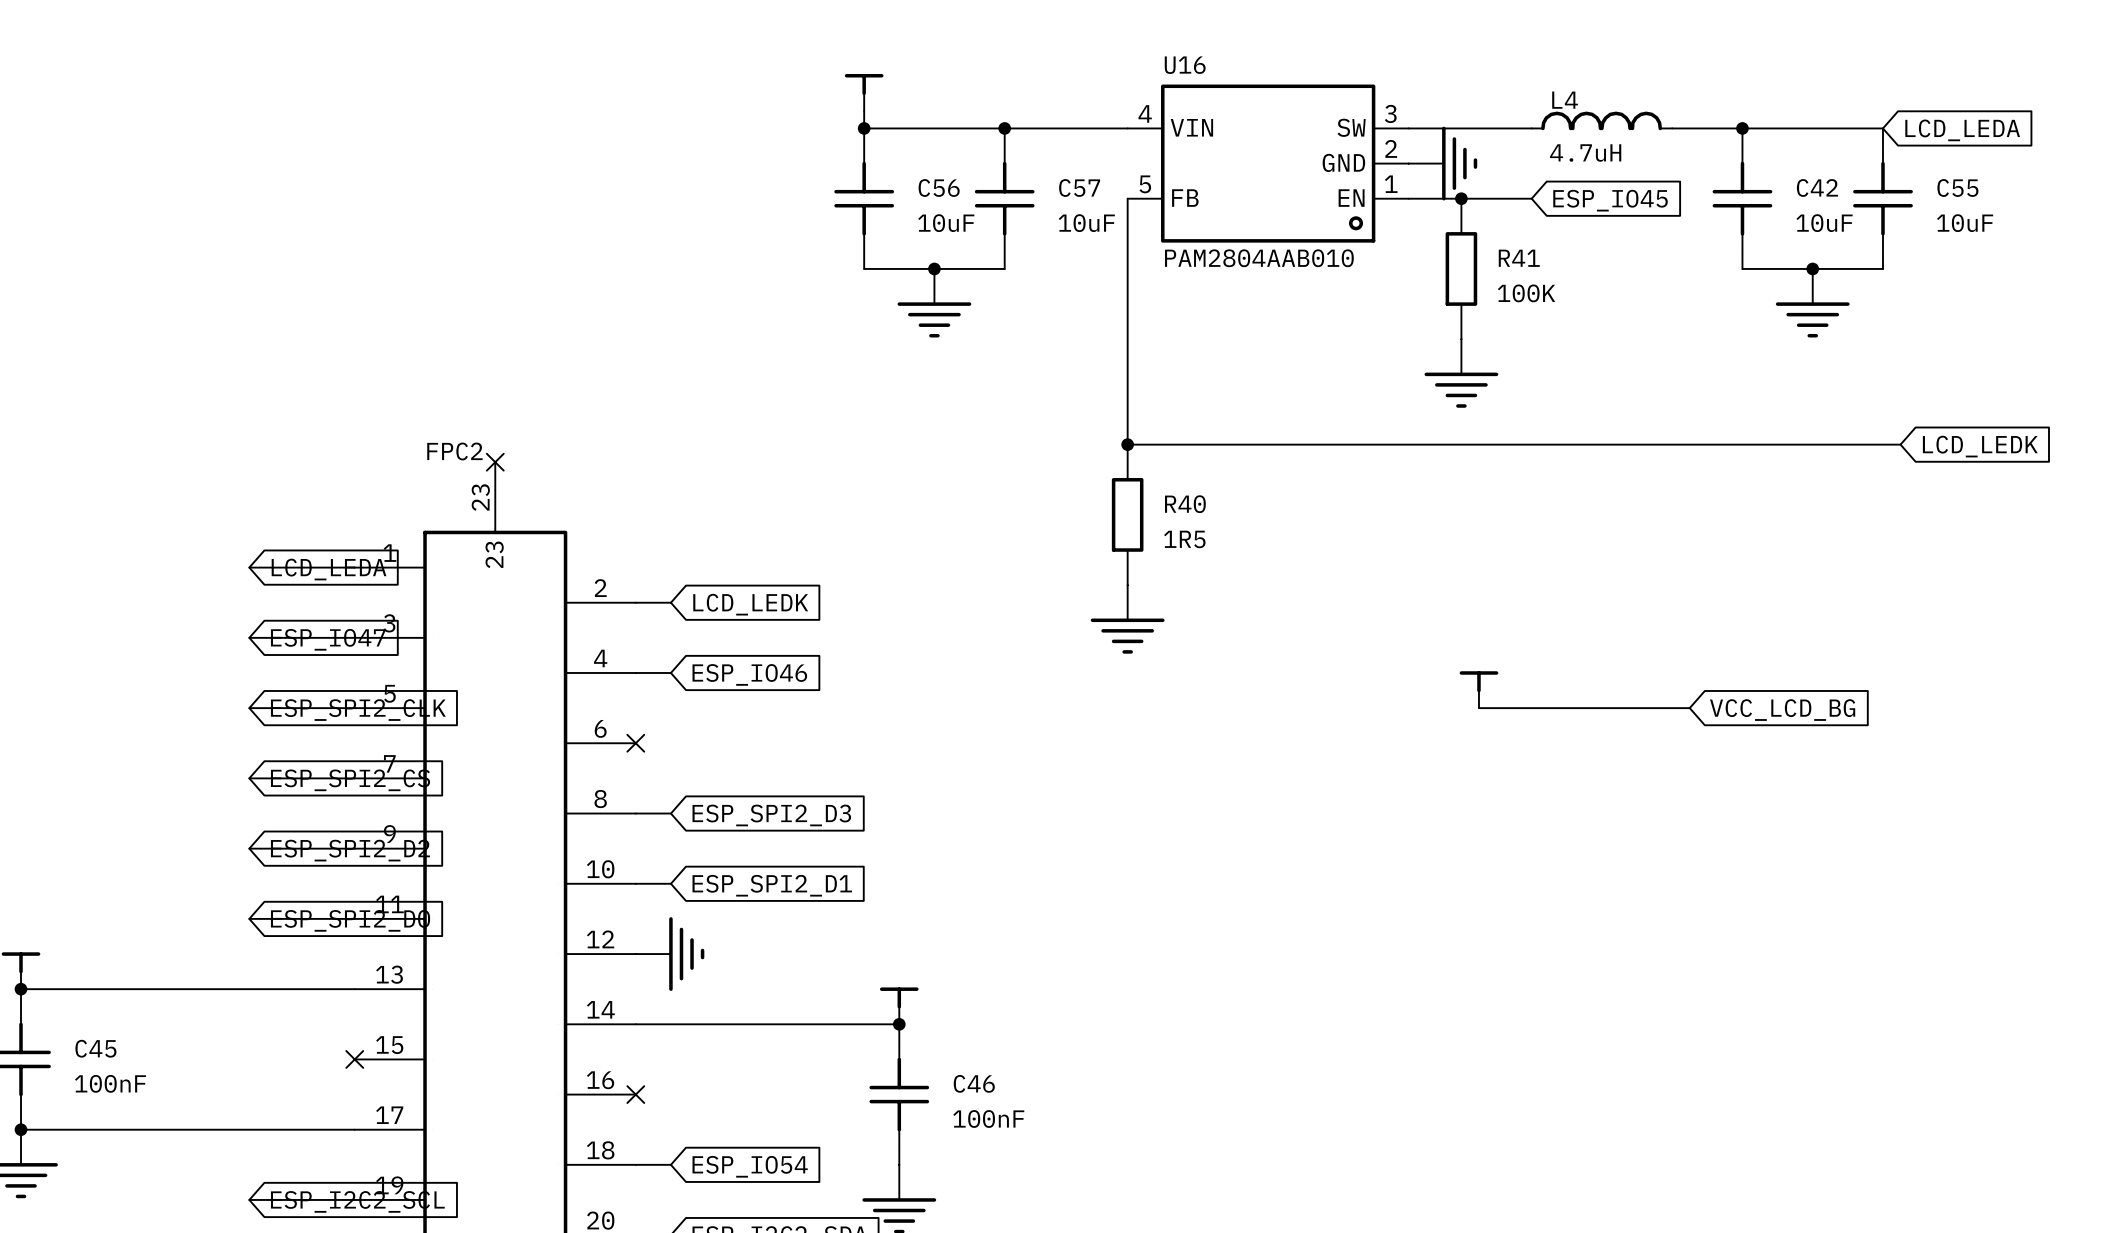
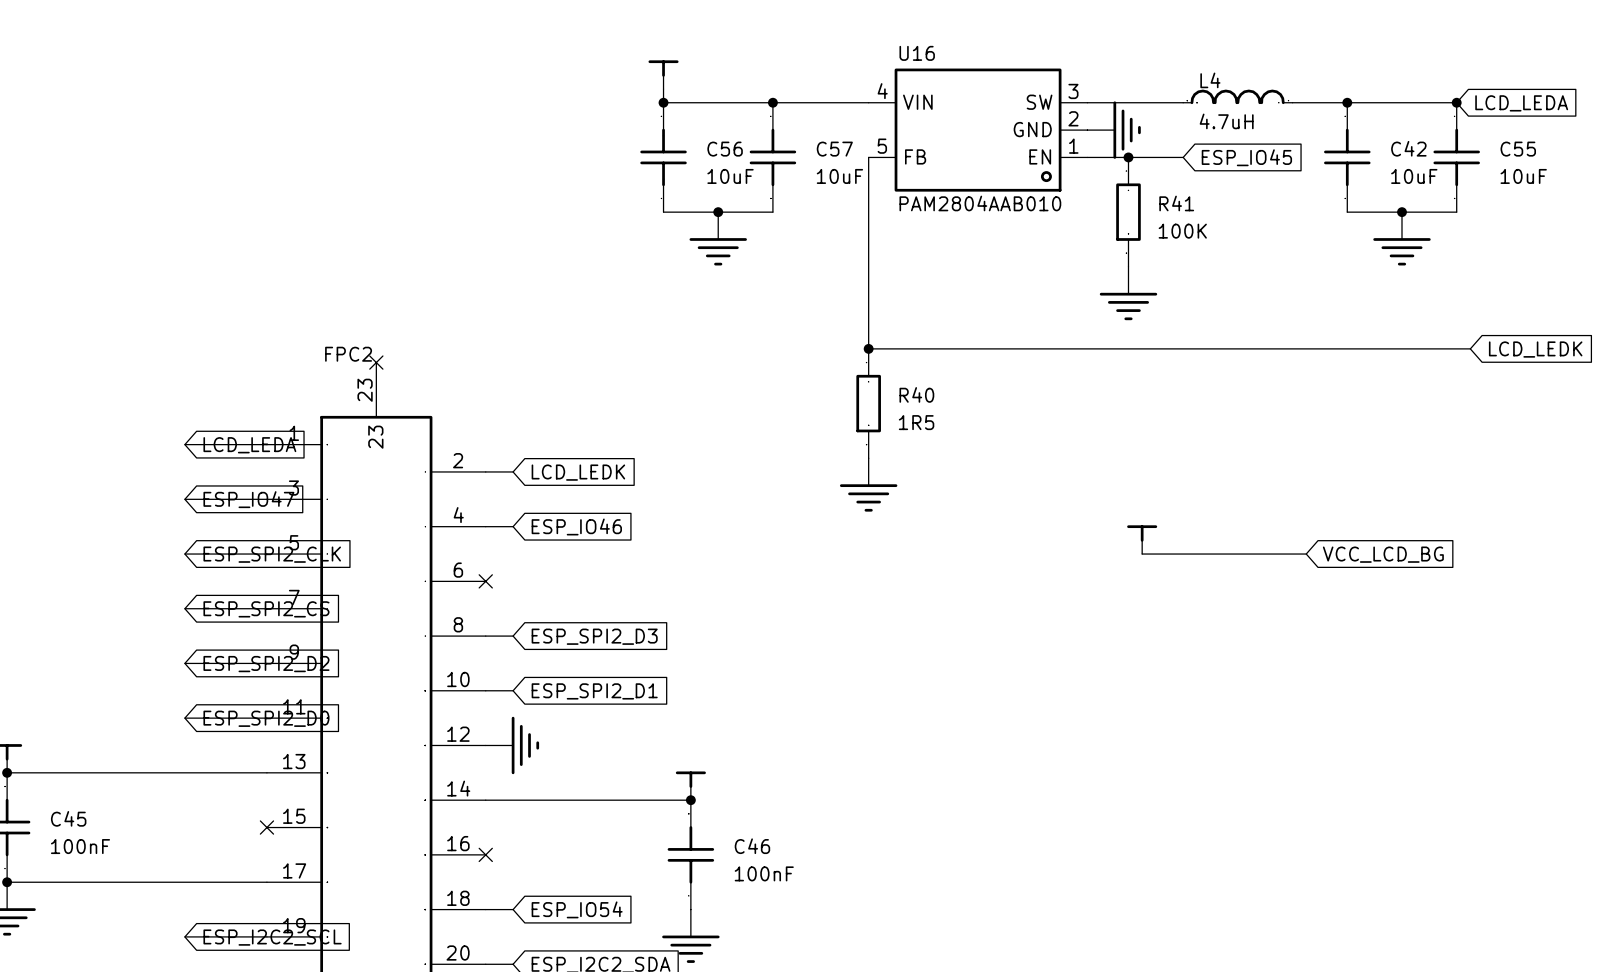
junction: none -> (1456, 102)

